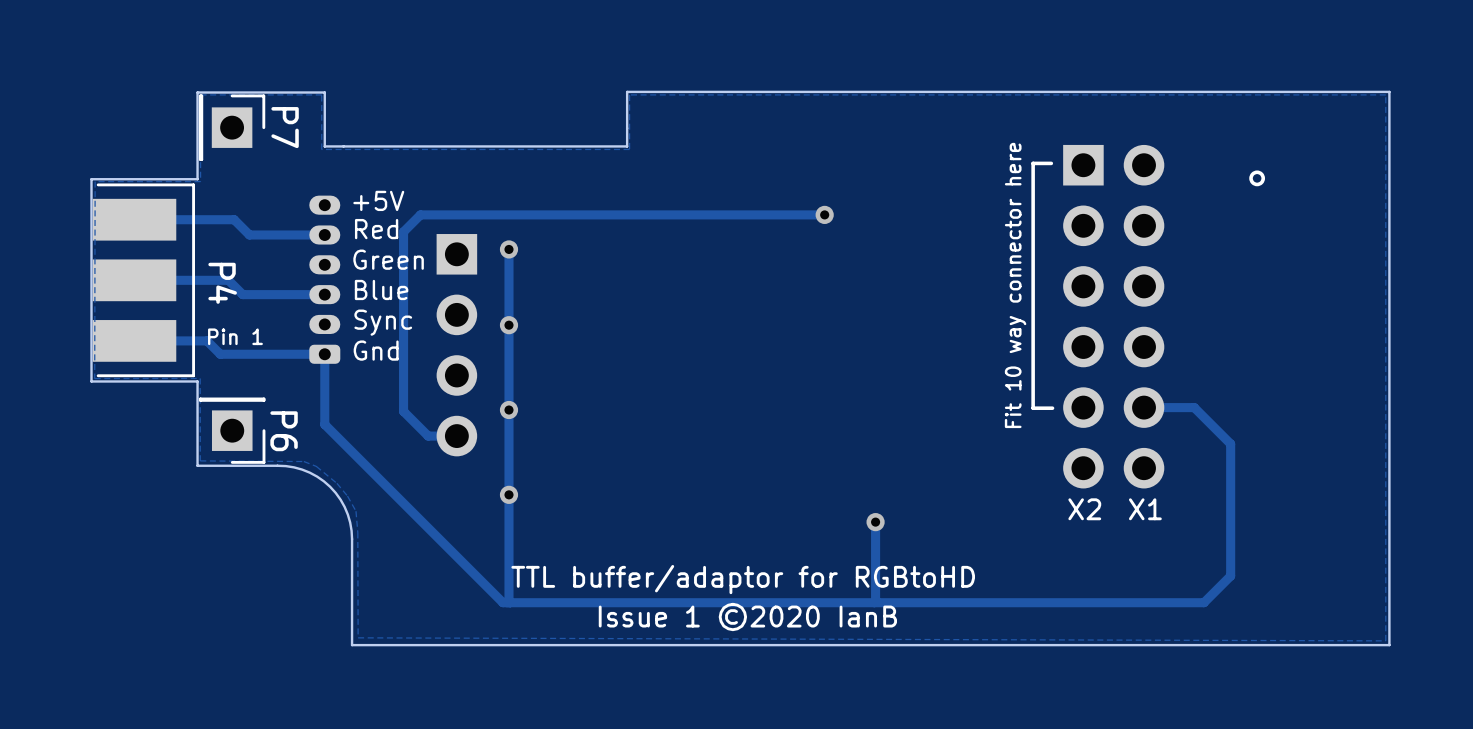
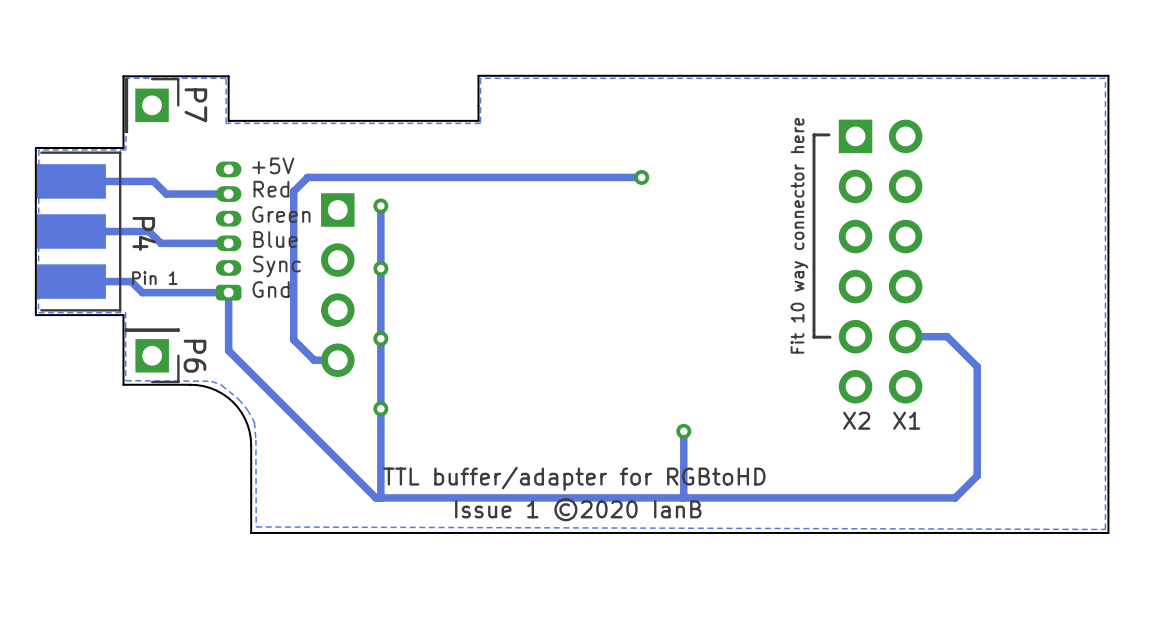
drawing: [1249, 170, 1266, 187] -> none
text: TTL buffer/adaptor for RGBtoHD (743, 579) -> TTL buffer/adapter for RGBtoHD (574, 478)

